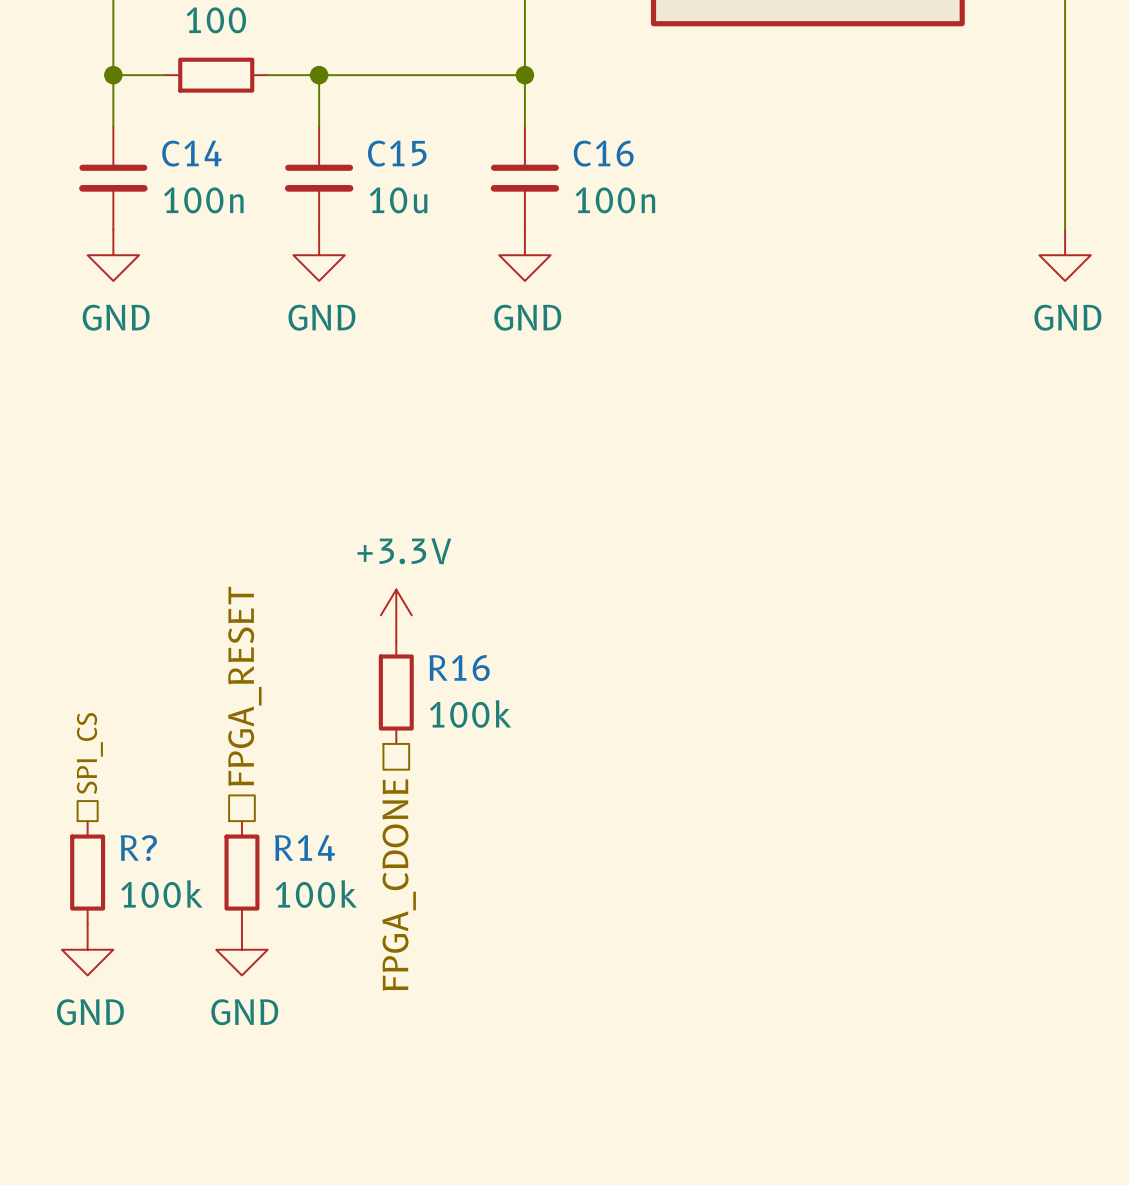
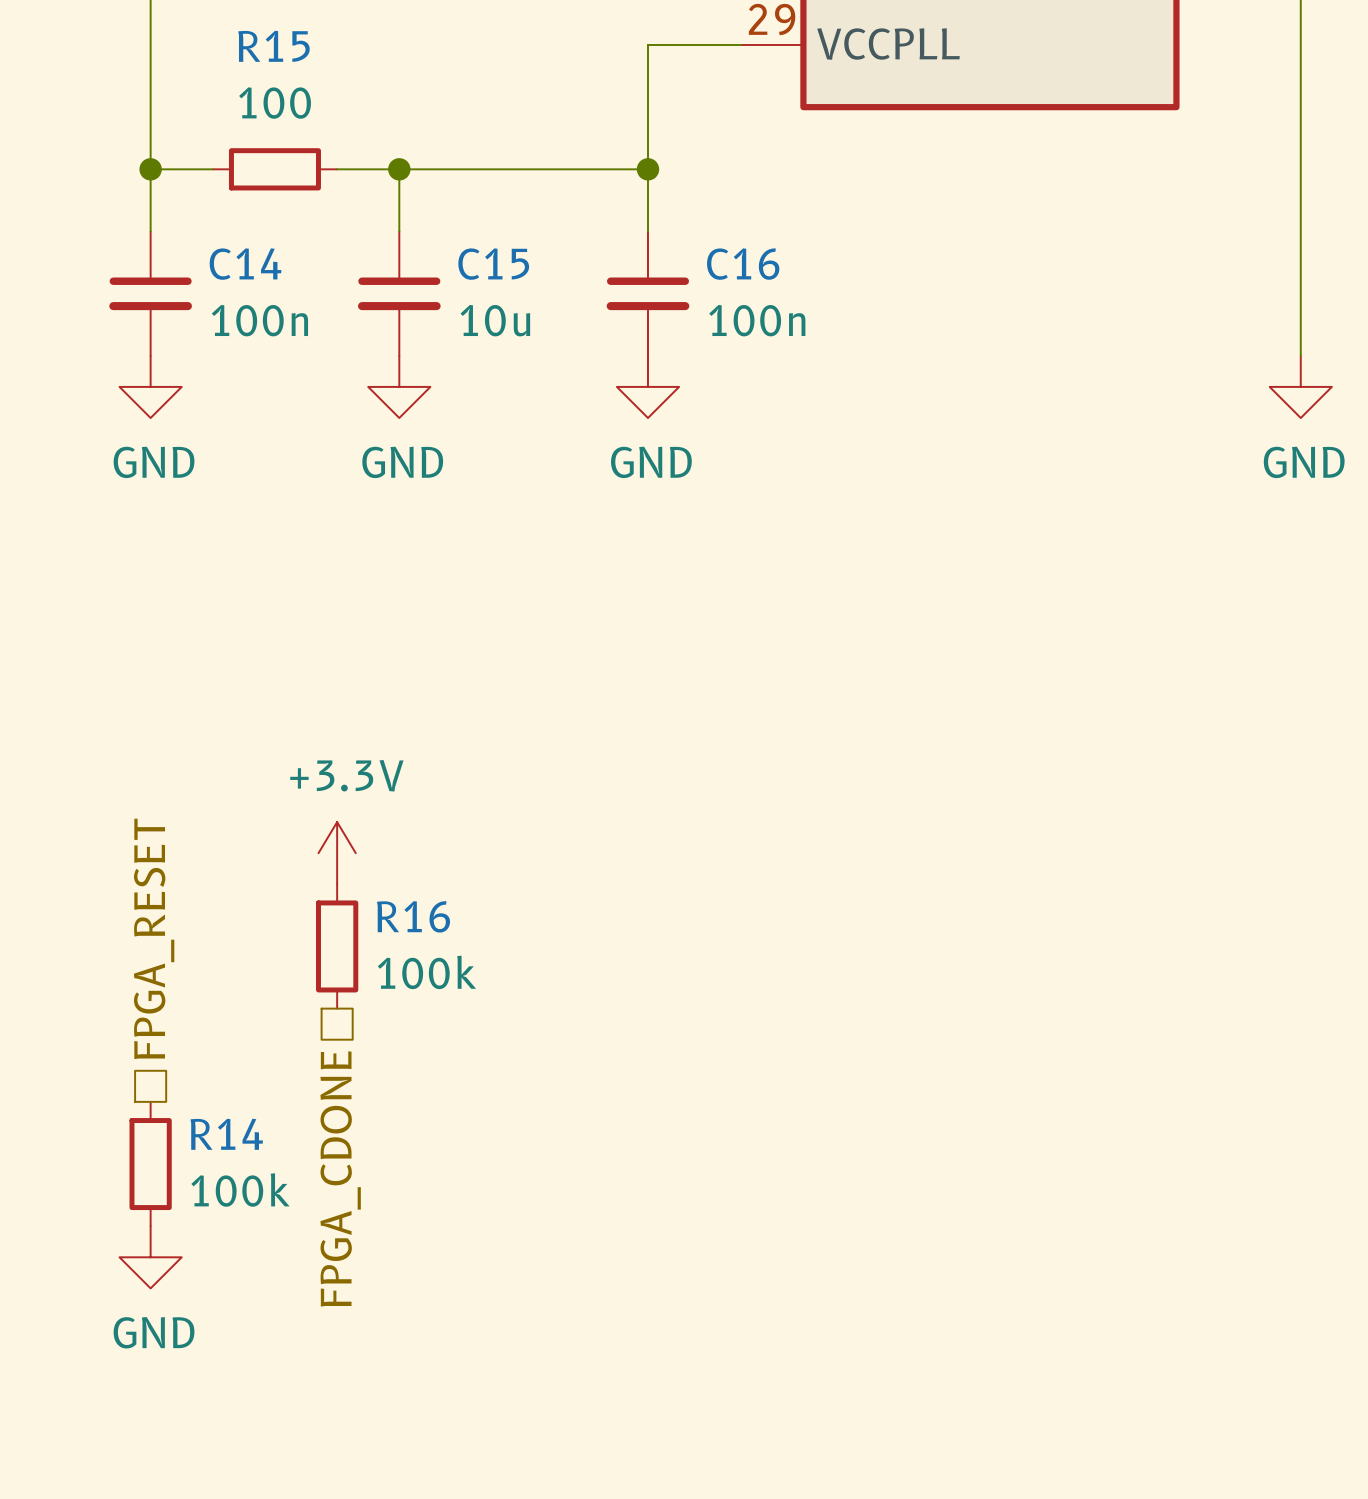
power symbol position: +3.3V (396, 615) -> +3.3V (337, 853)
hierarchical label position: FPGA_RESET (244, 686) -> FPGA_RESET (154, 938)
R16 position: (396, 692) -> (337, 946)
hierarchical label: SPI_CS (89, 753) -> none
R?: 100k (87, 872) -> none
R14 position: (241, 872) -> (150, 1164)
hierarchical label position: FPGA_CDONE (399, 884) -> FPGA_CDONE (340, 1178)
power symbol position: GND (87, 949) -> GND (150, 1257)
power symbol: GND (241, 949) -> none

